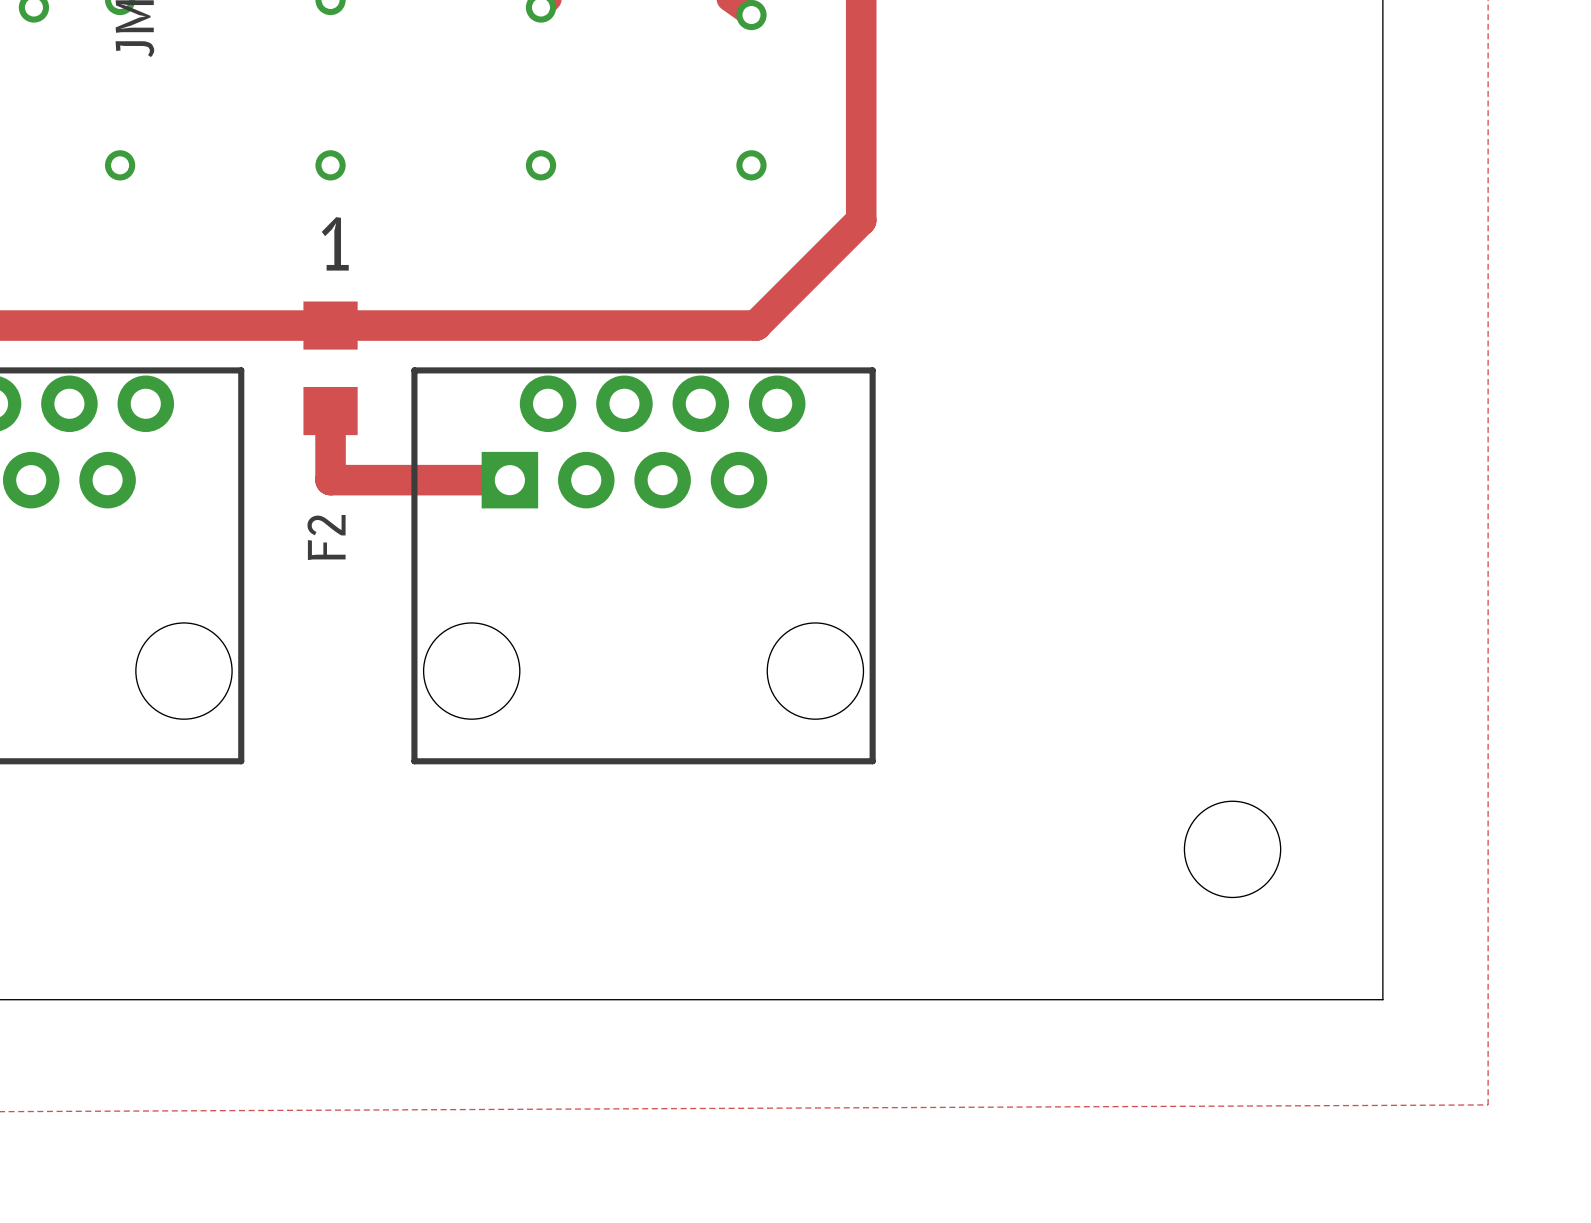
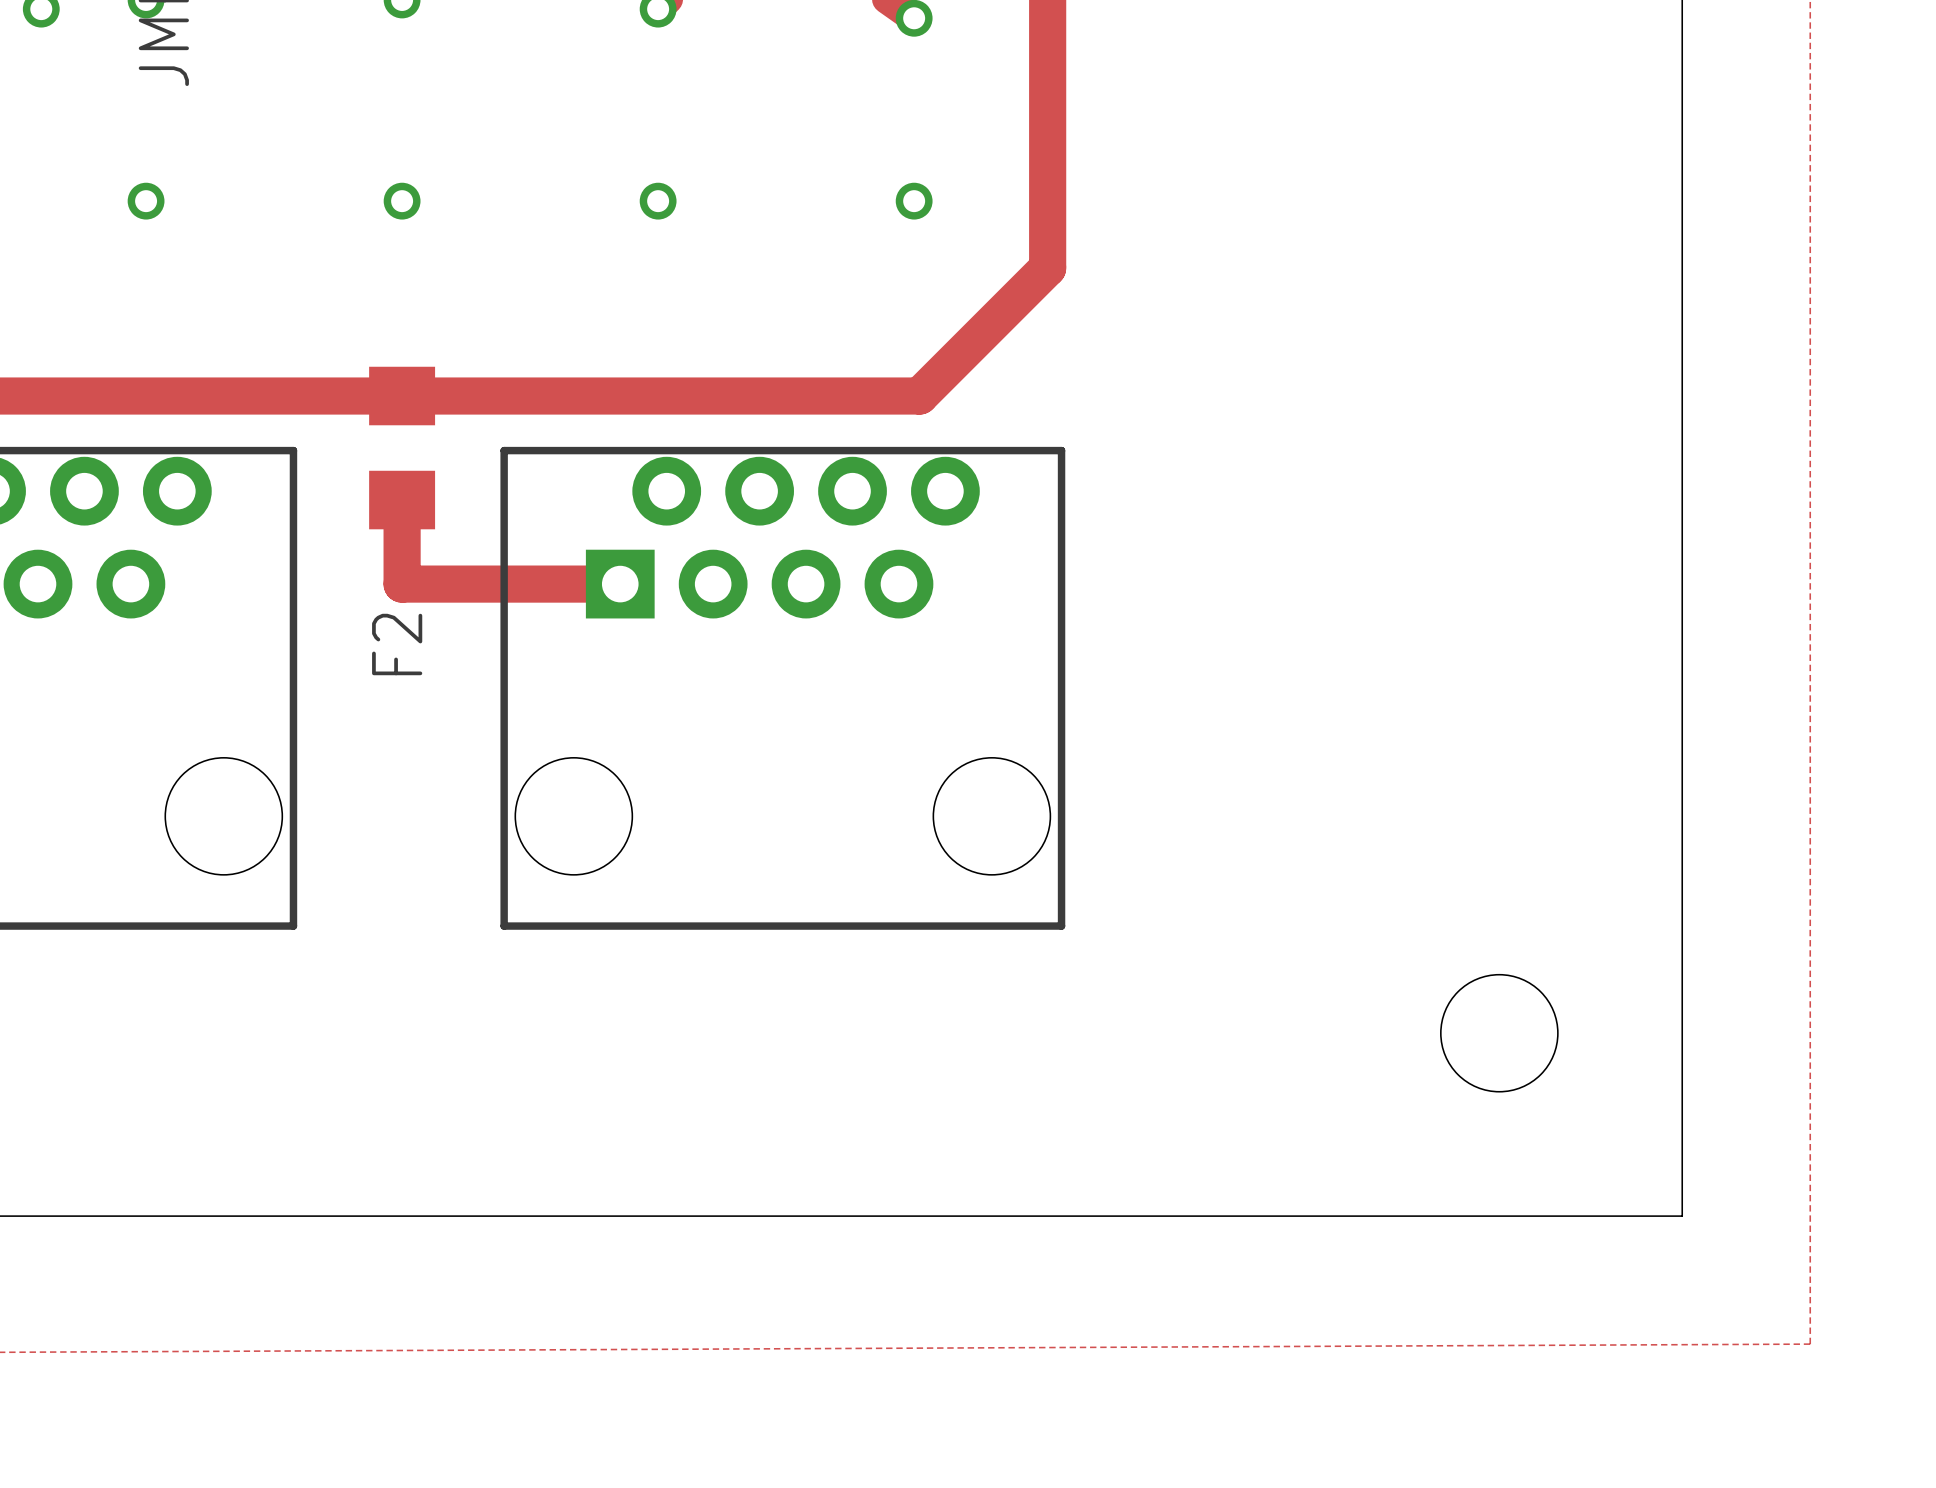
text: 1 (335, 243) -> none

